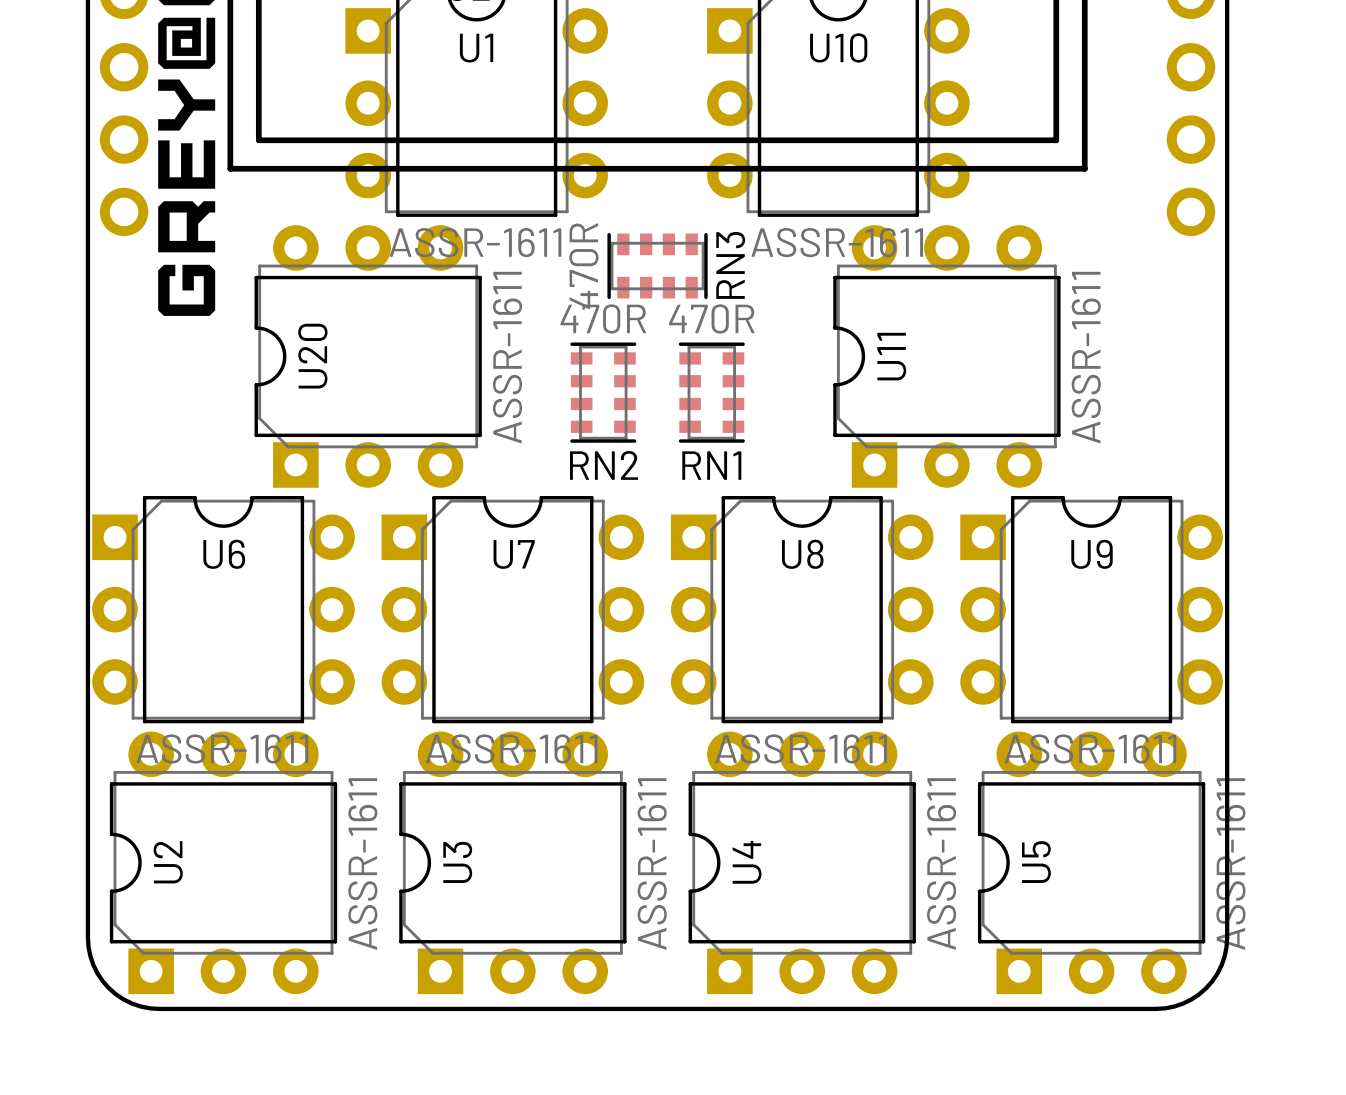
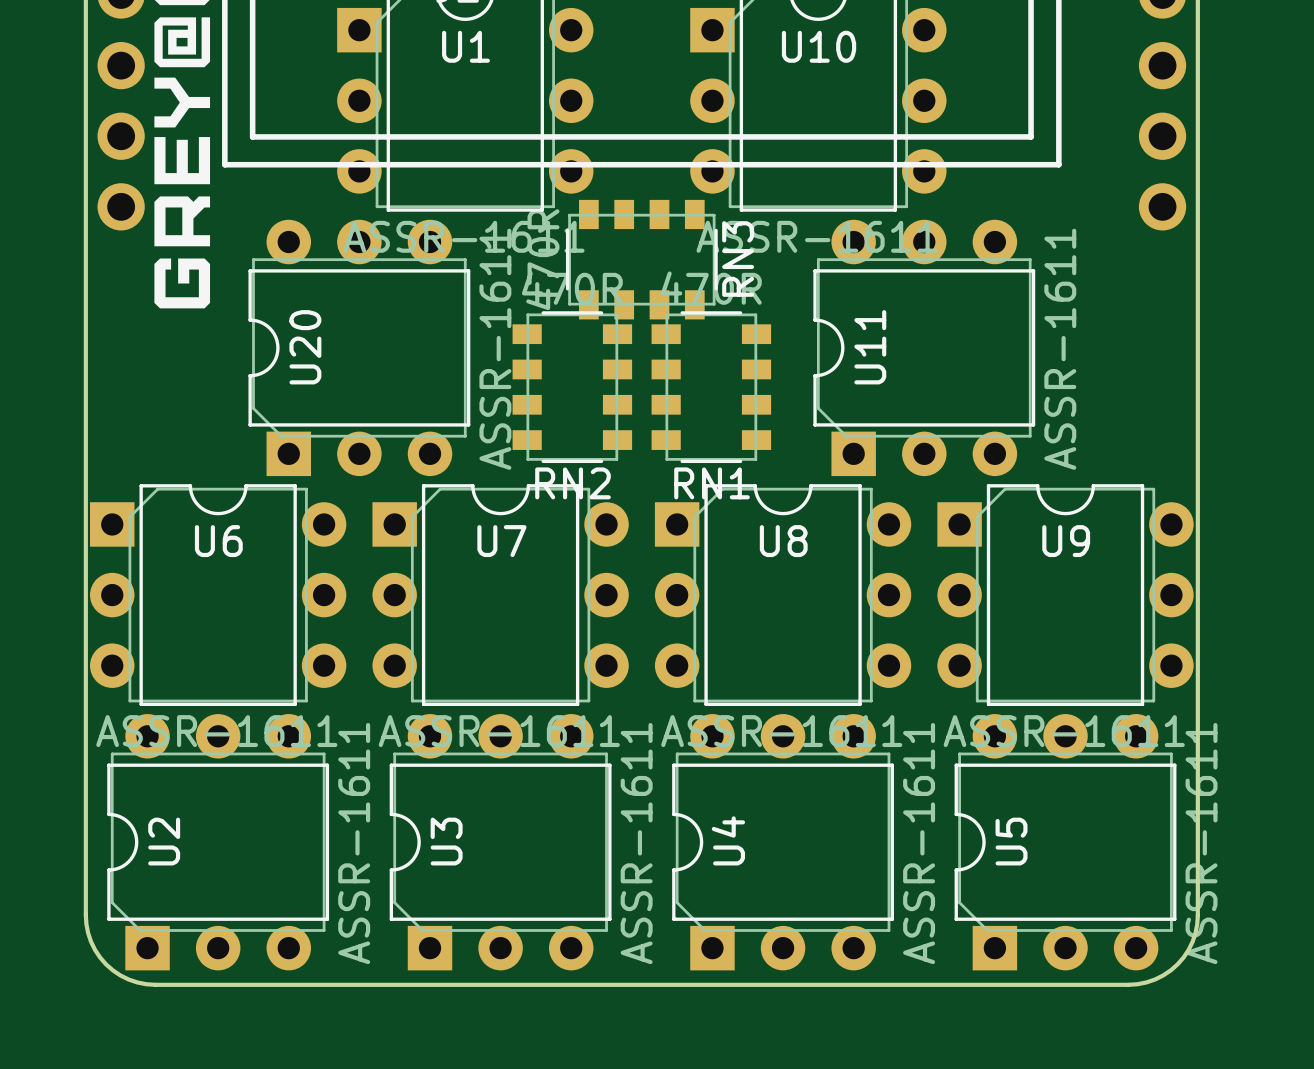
RN3 footprint: [607, 232, 708, 300] -> [565, 199, 718, 320]
RN2 footprint: [570, 342, 637, 443] -> [512, 311, 633, 464]
RN1 footprint: [678, 342, 745, 443] -> [651, 311, 772, 464]

